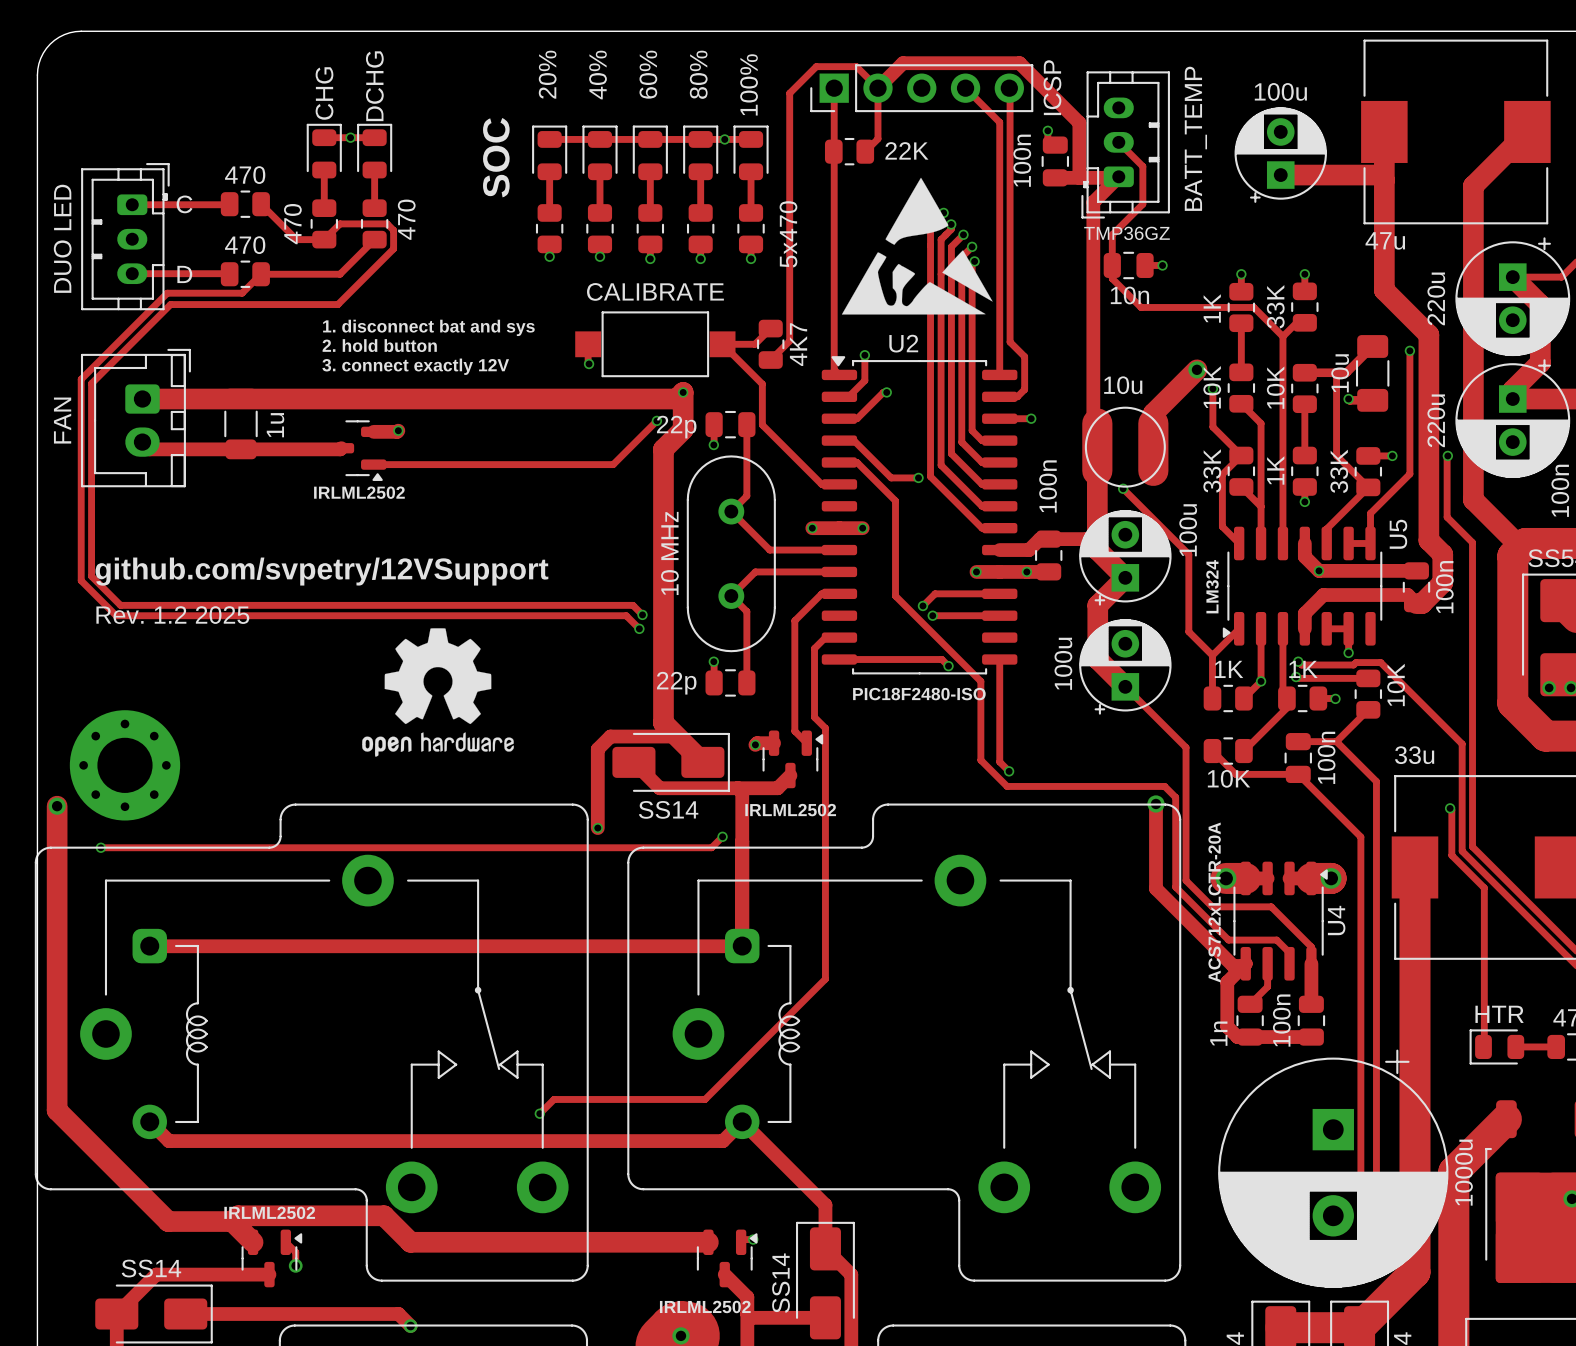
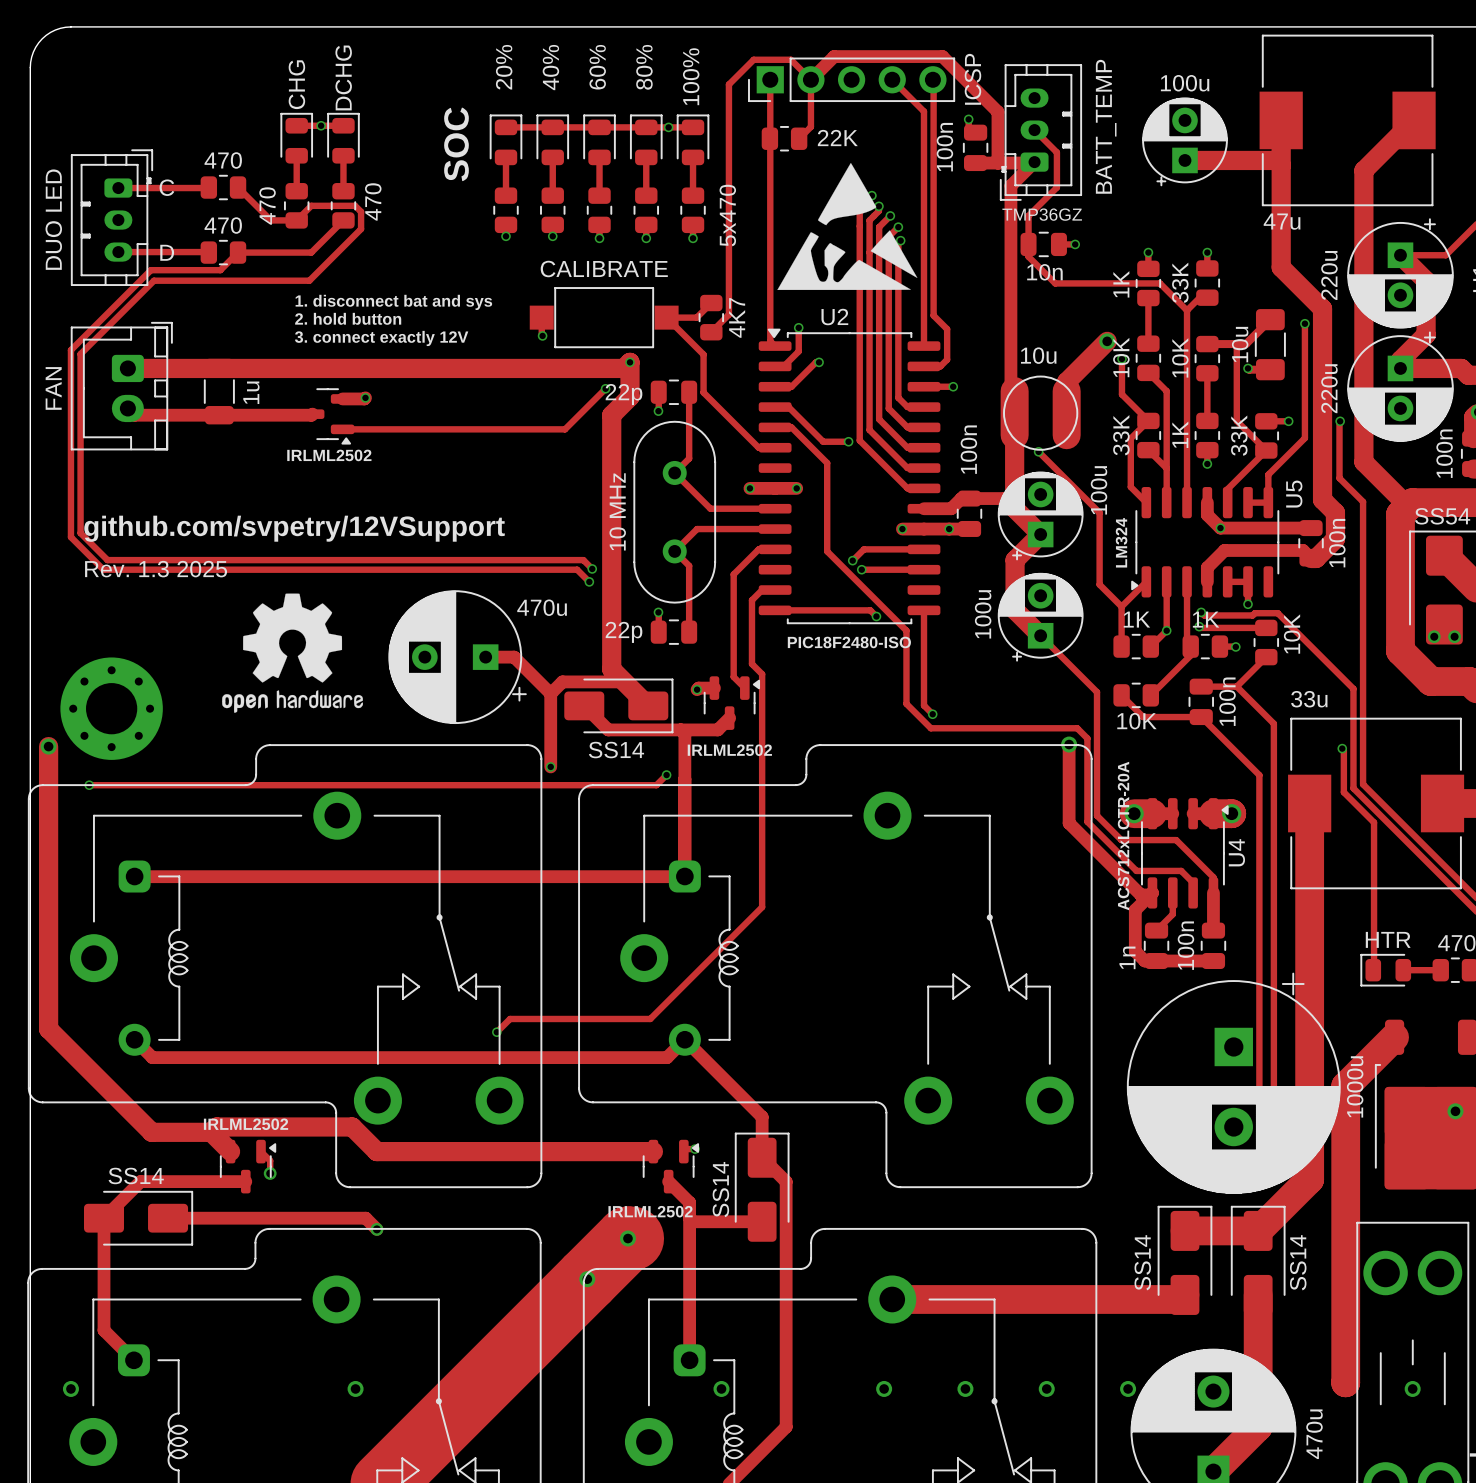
text: Rev. 1.2 2025 (172, 615) -> Rev. 1.3 2025 (156, 569)
drawing position: (438, 692) -> (292, 653)
part: none -> 470u (457, 657)
track: none -> (485, 657) (514, 657) (550, 693)

